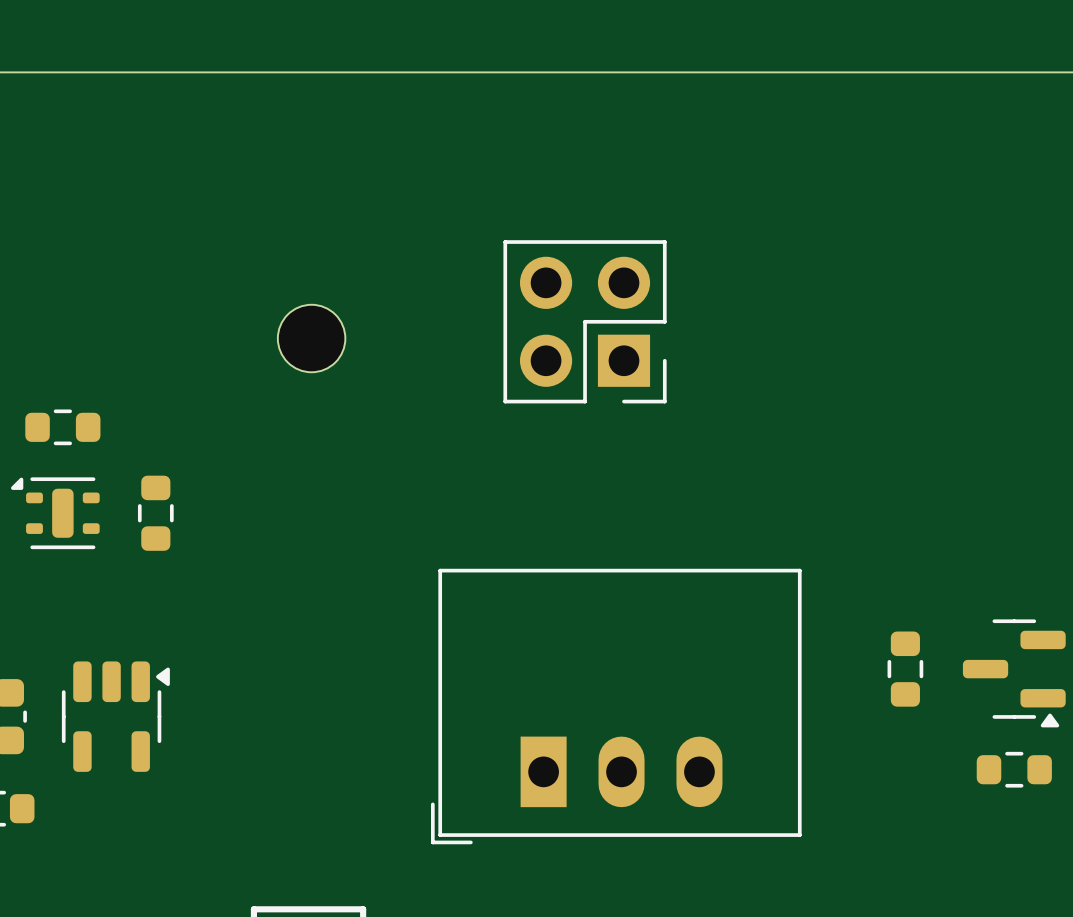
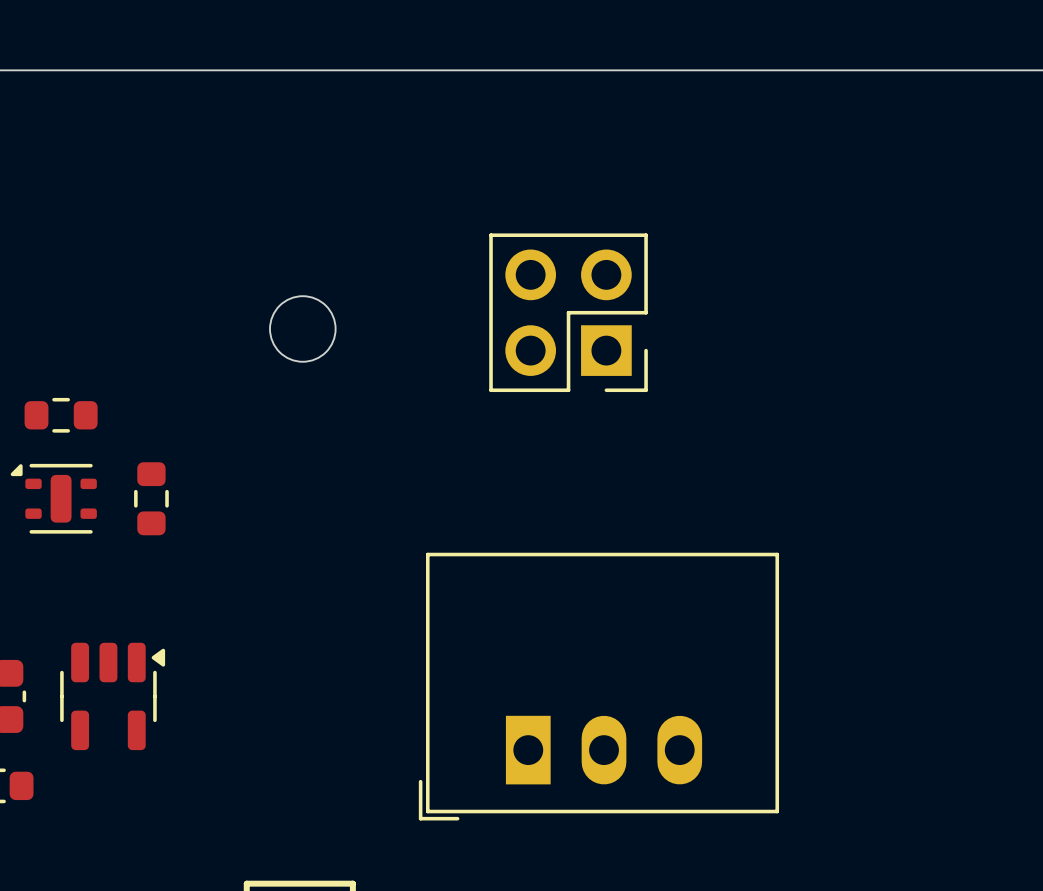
part: (905, 669) -> none
part: (1014, 673) -> none
part: (1014, 769) -> none

